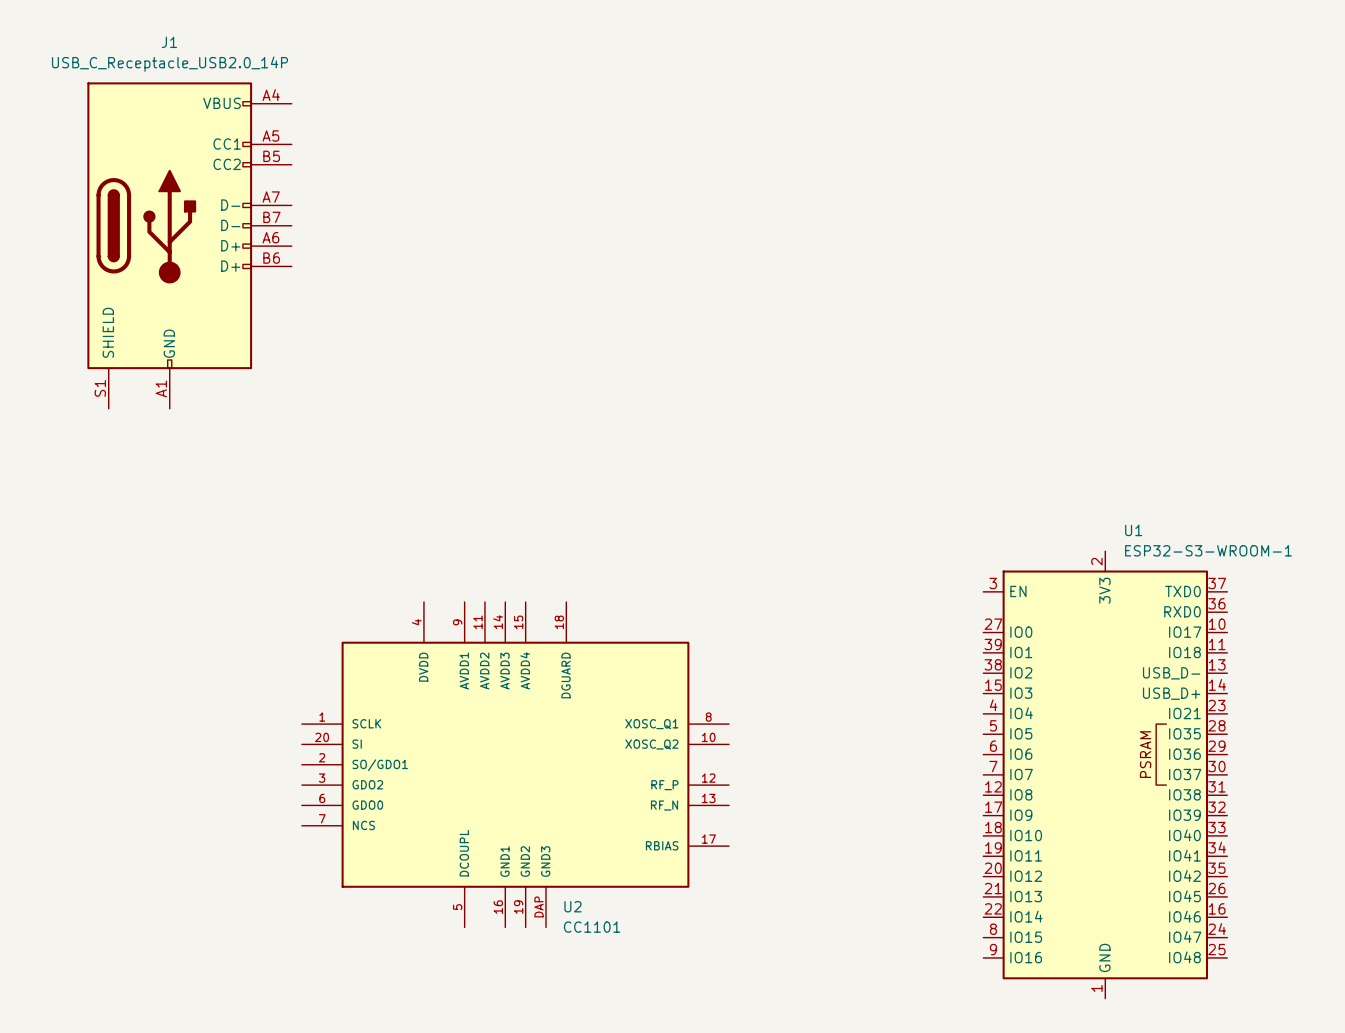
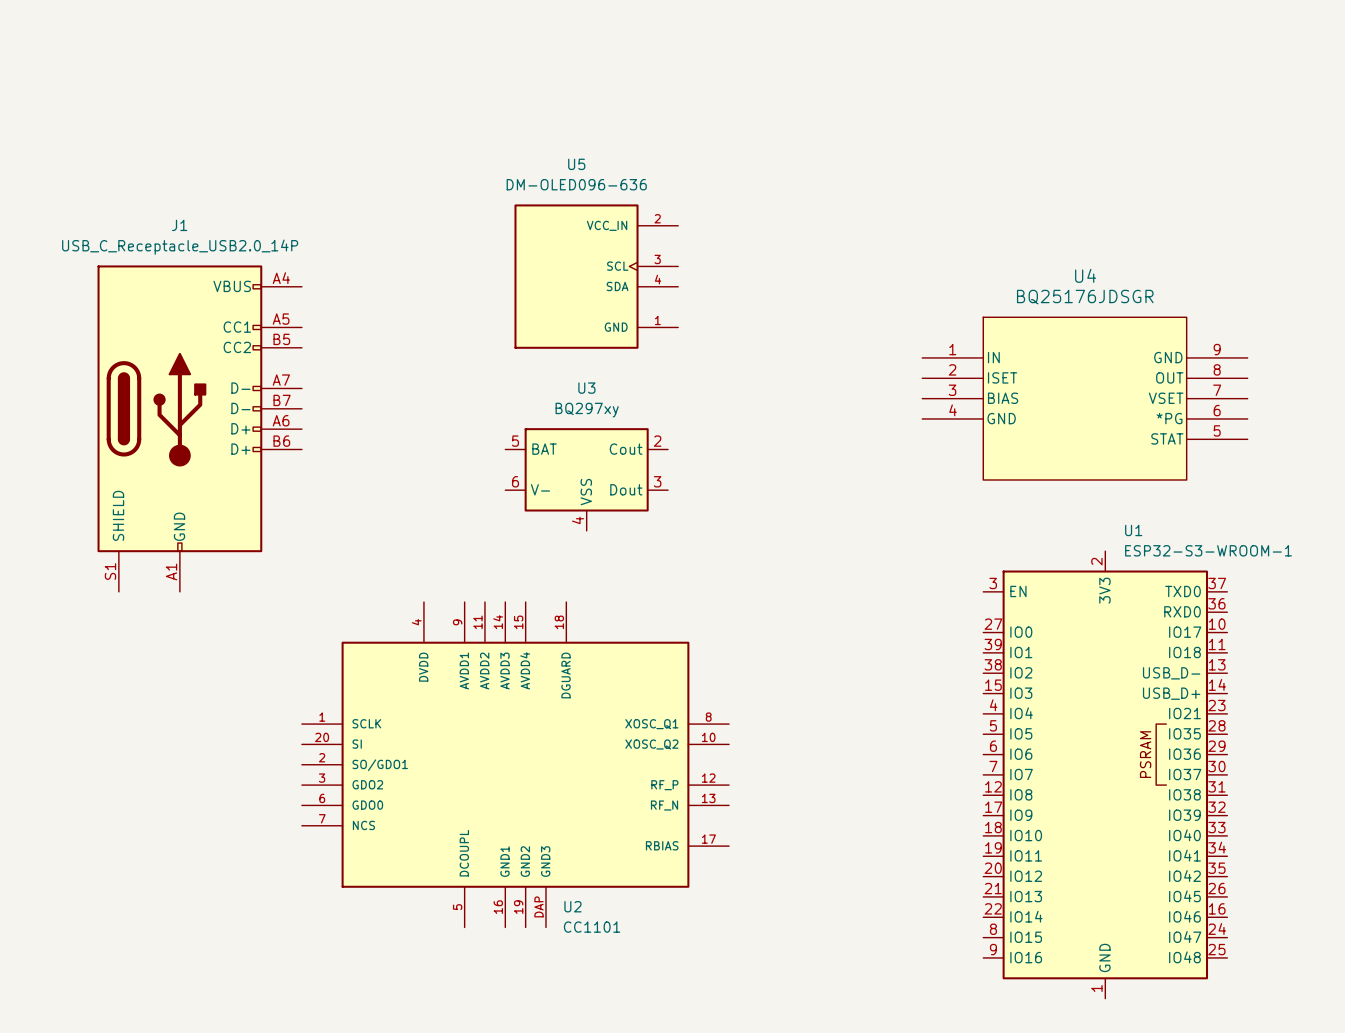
J1 position: (189, 245) -> (199, 428)
U5: none -> DM-OLED096-636 (596, 276)
U4: none -> BQ25176JDSGR (1084, 398)
U3: none -> BQ297xy (586, 479)

